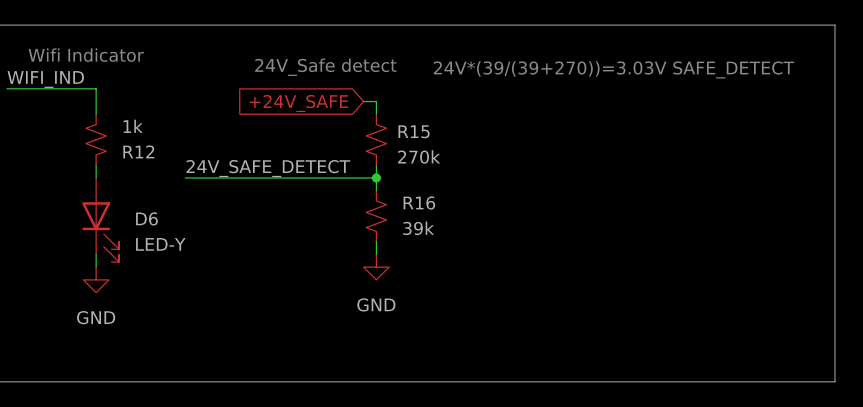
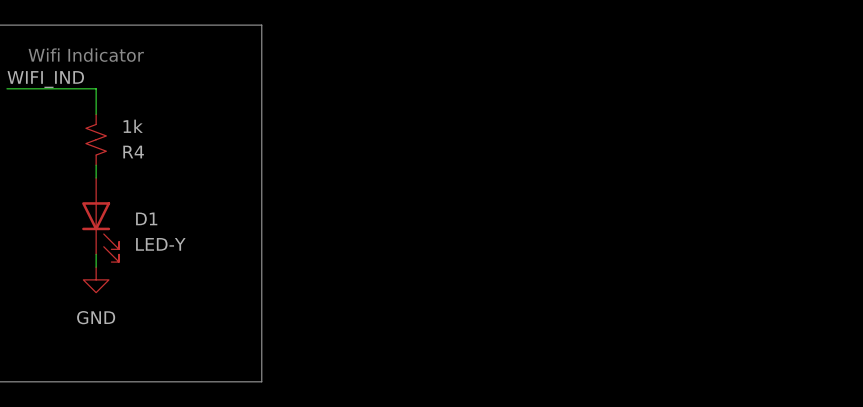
line: (261, 25) (834, 25) (834, 381) (261, 381) -> (261, 25) (261, 381)
text: 24V_Safe detect (325, 67) -> none
text: 24V*(39/(39+270))=3.03V SAFE_DETECT (614, 69) -> none
wire: (363, 101) (376, 101) (376, 114) -> none
global label: +24V_SAFE (298, 103) -> none
R15: 270k (376, 139) -> none
R12 name: R12 (138, 151) -> R4 (133, 152)
wire: (376, 165) (376, 190) -> none
label: 24V_SAFE_DETECT (268, 168) -> none
wire: (185, 177) (376, 177) -> none
junction: (376, 177) -> none
R16: 39k (376, 216) -> none
D6 name: D6 (146, 218) -> D1 (146, 218)
wire: (376, 241) (376, 254) -> none
power symbol: GND (376, 267) -> none

